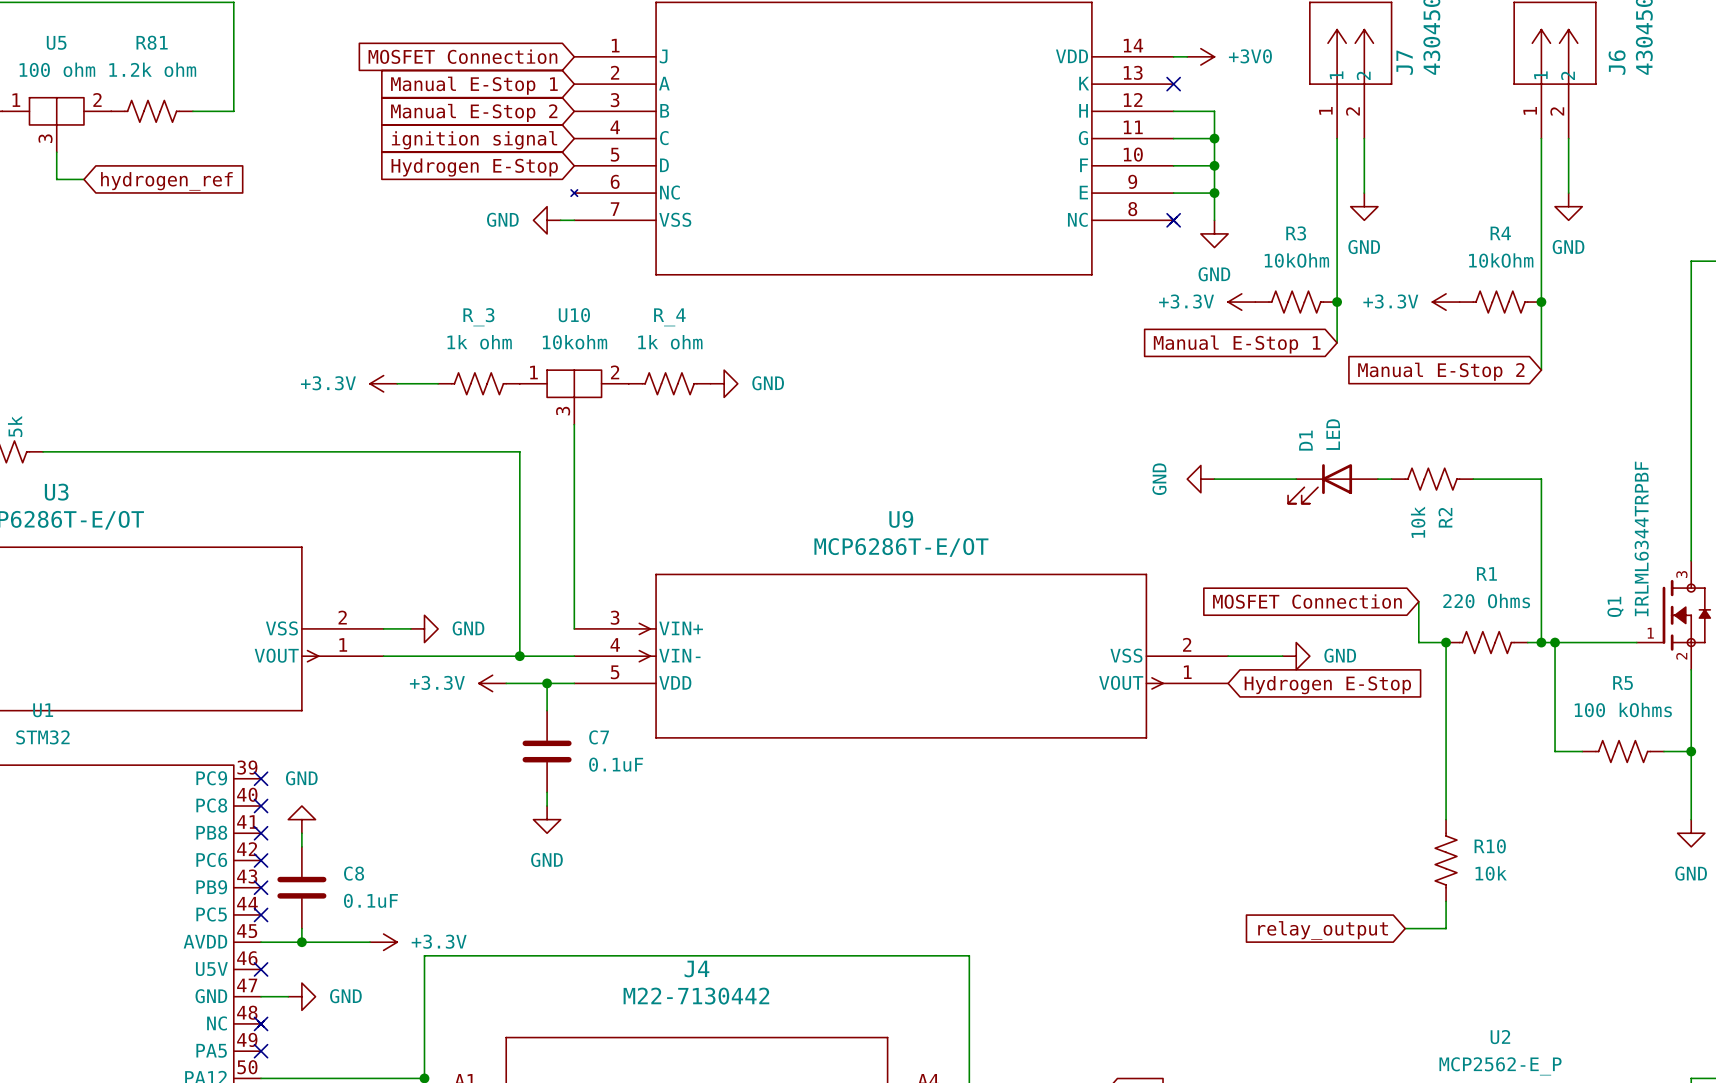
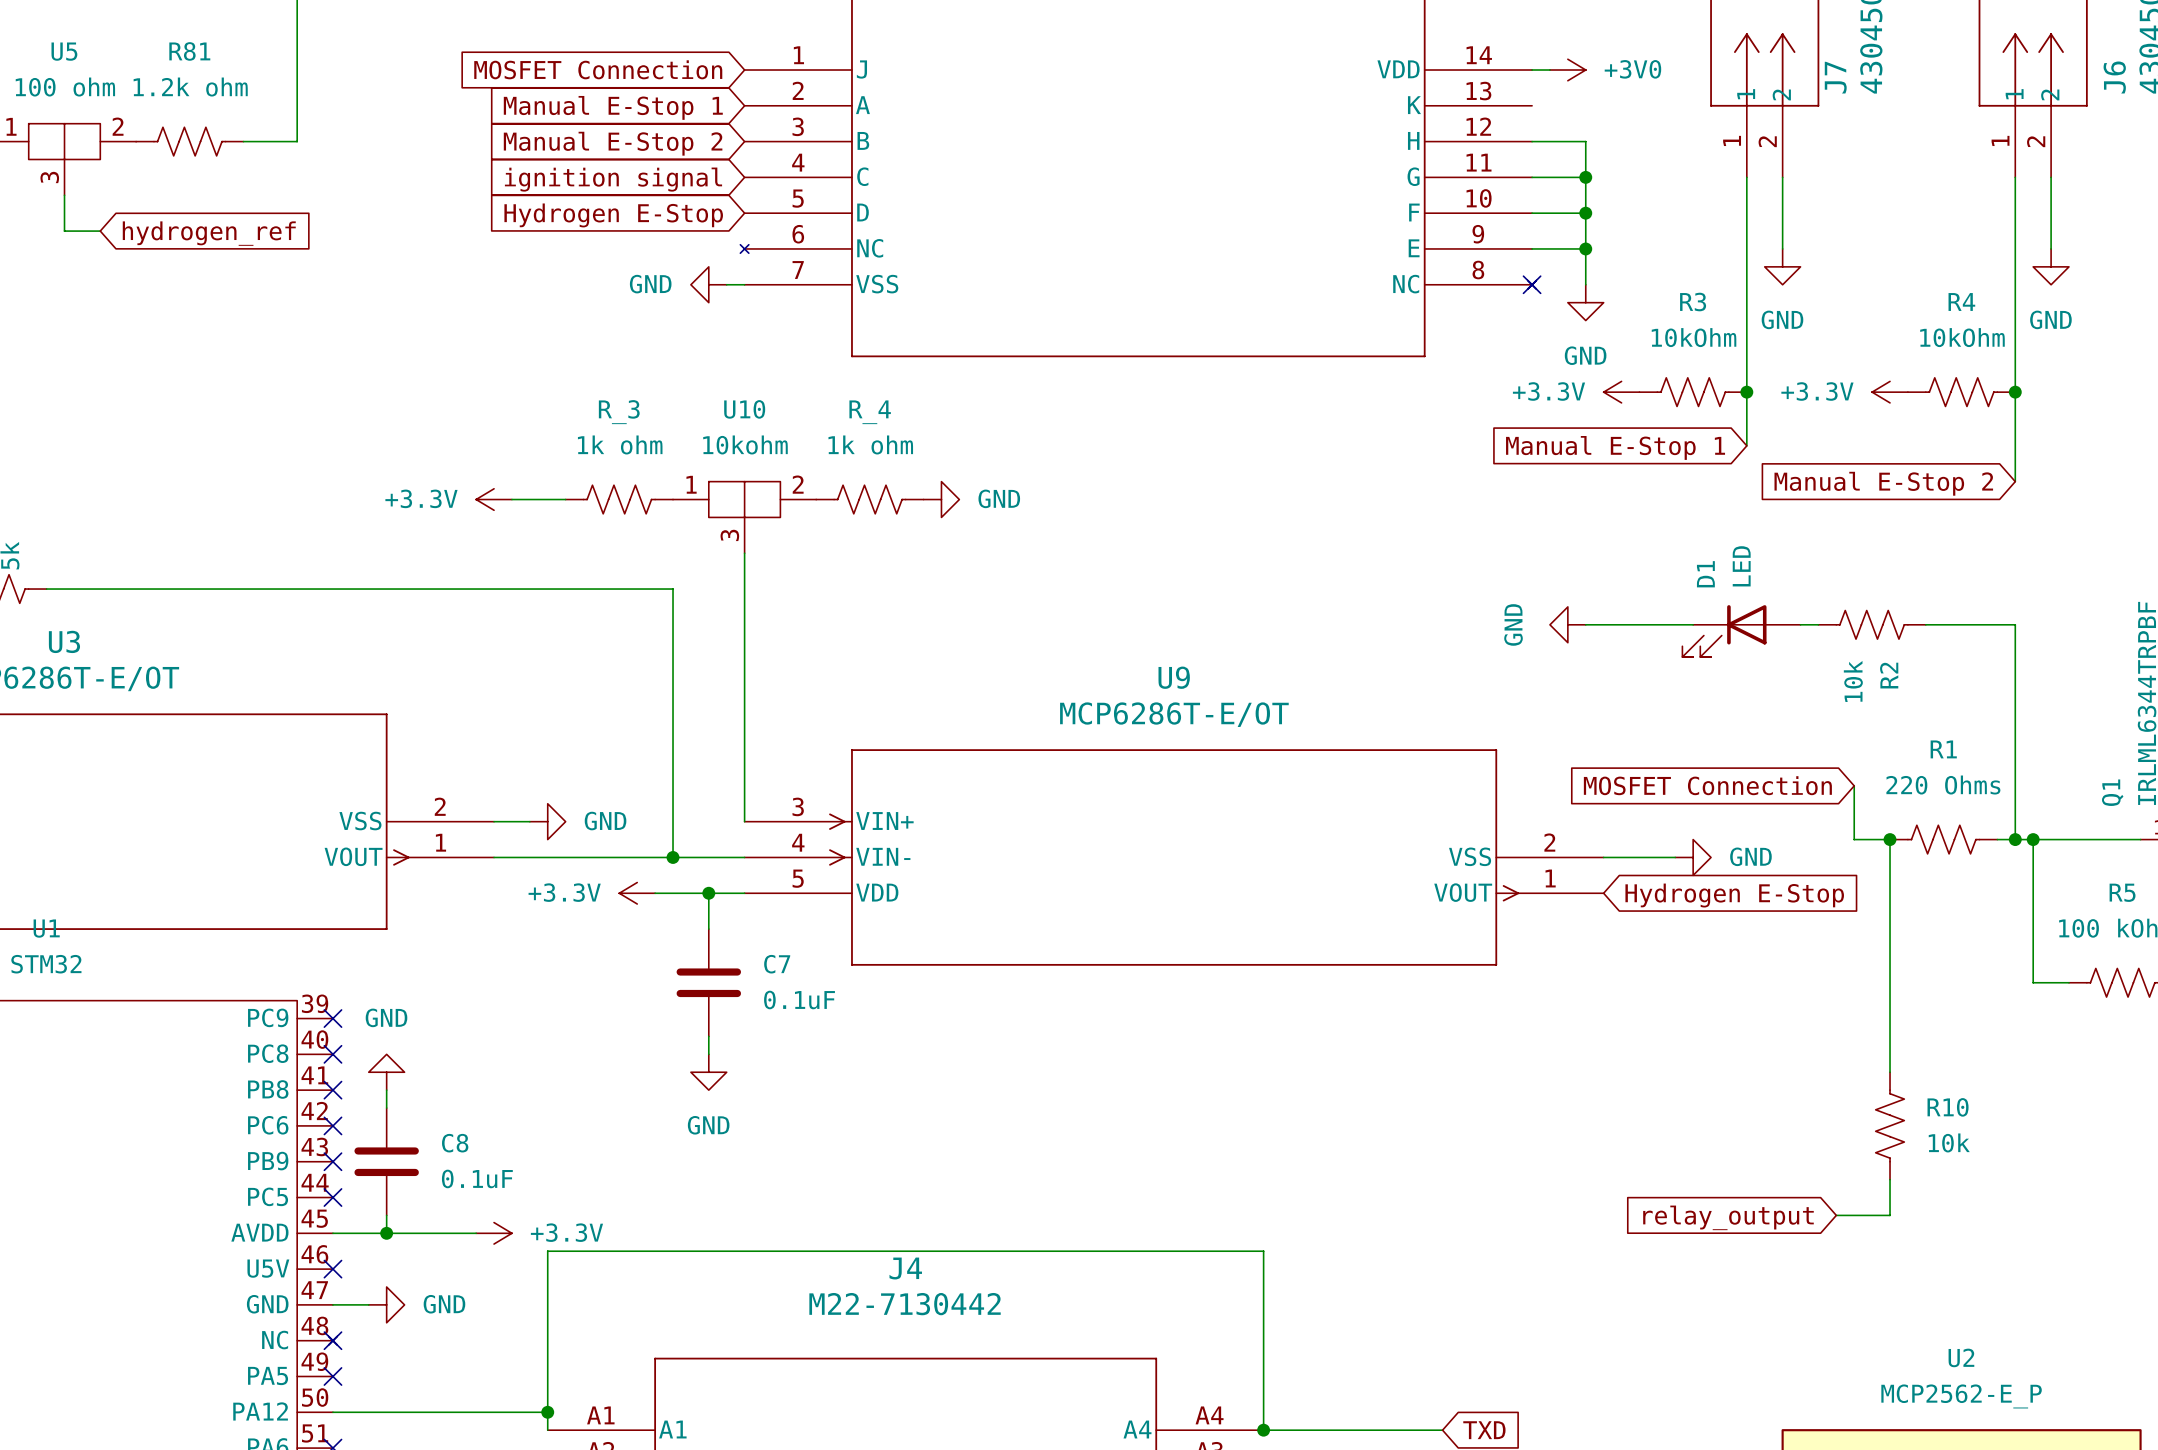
no-connect mark: (1173, 84) -> none

